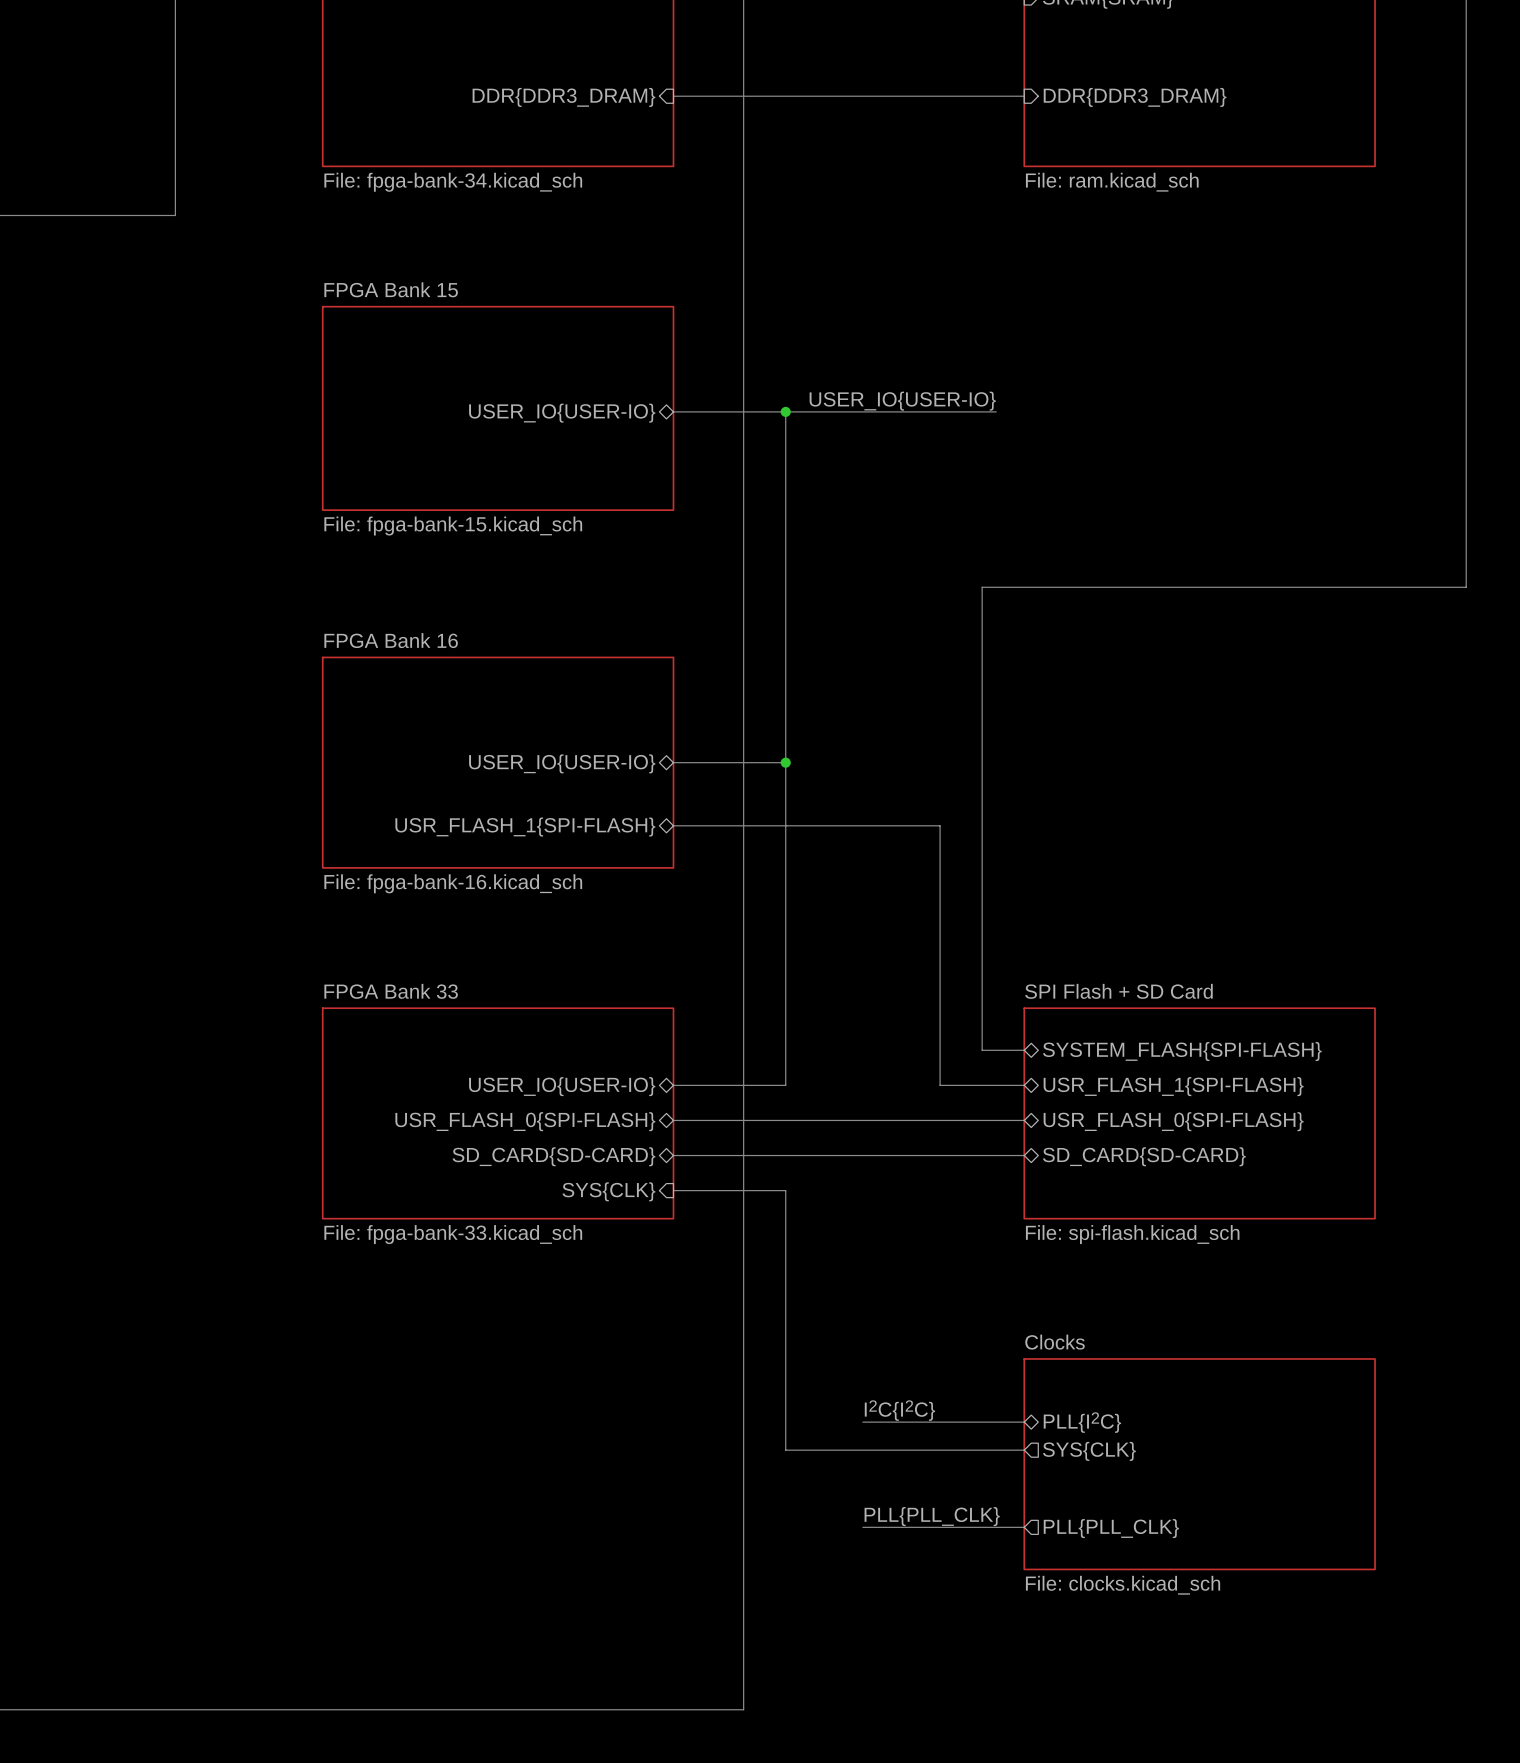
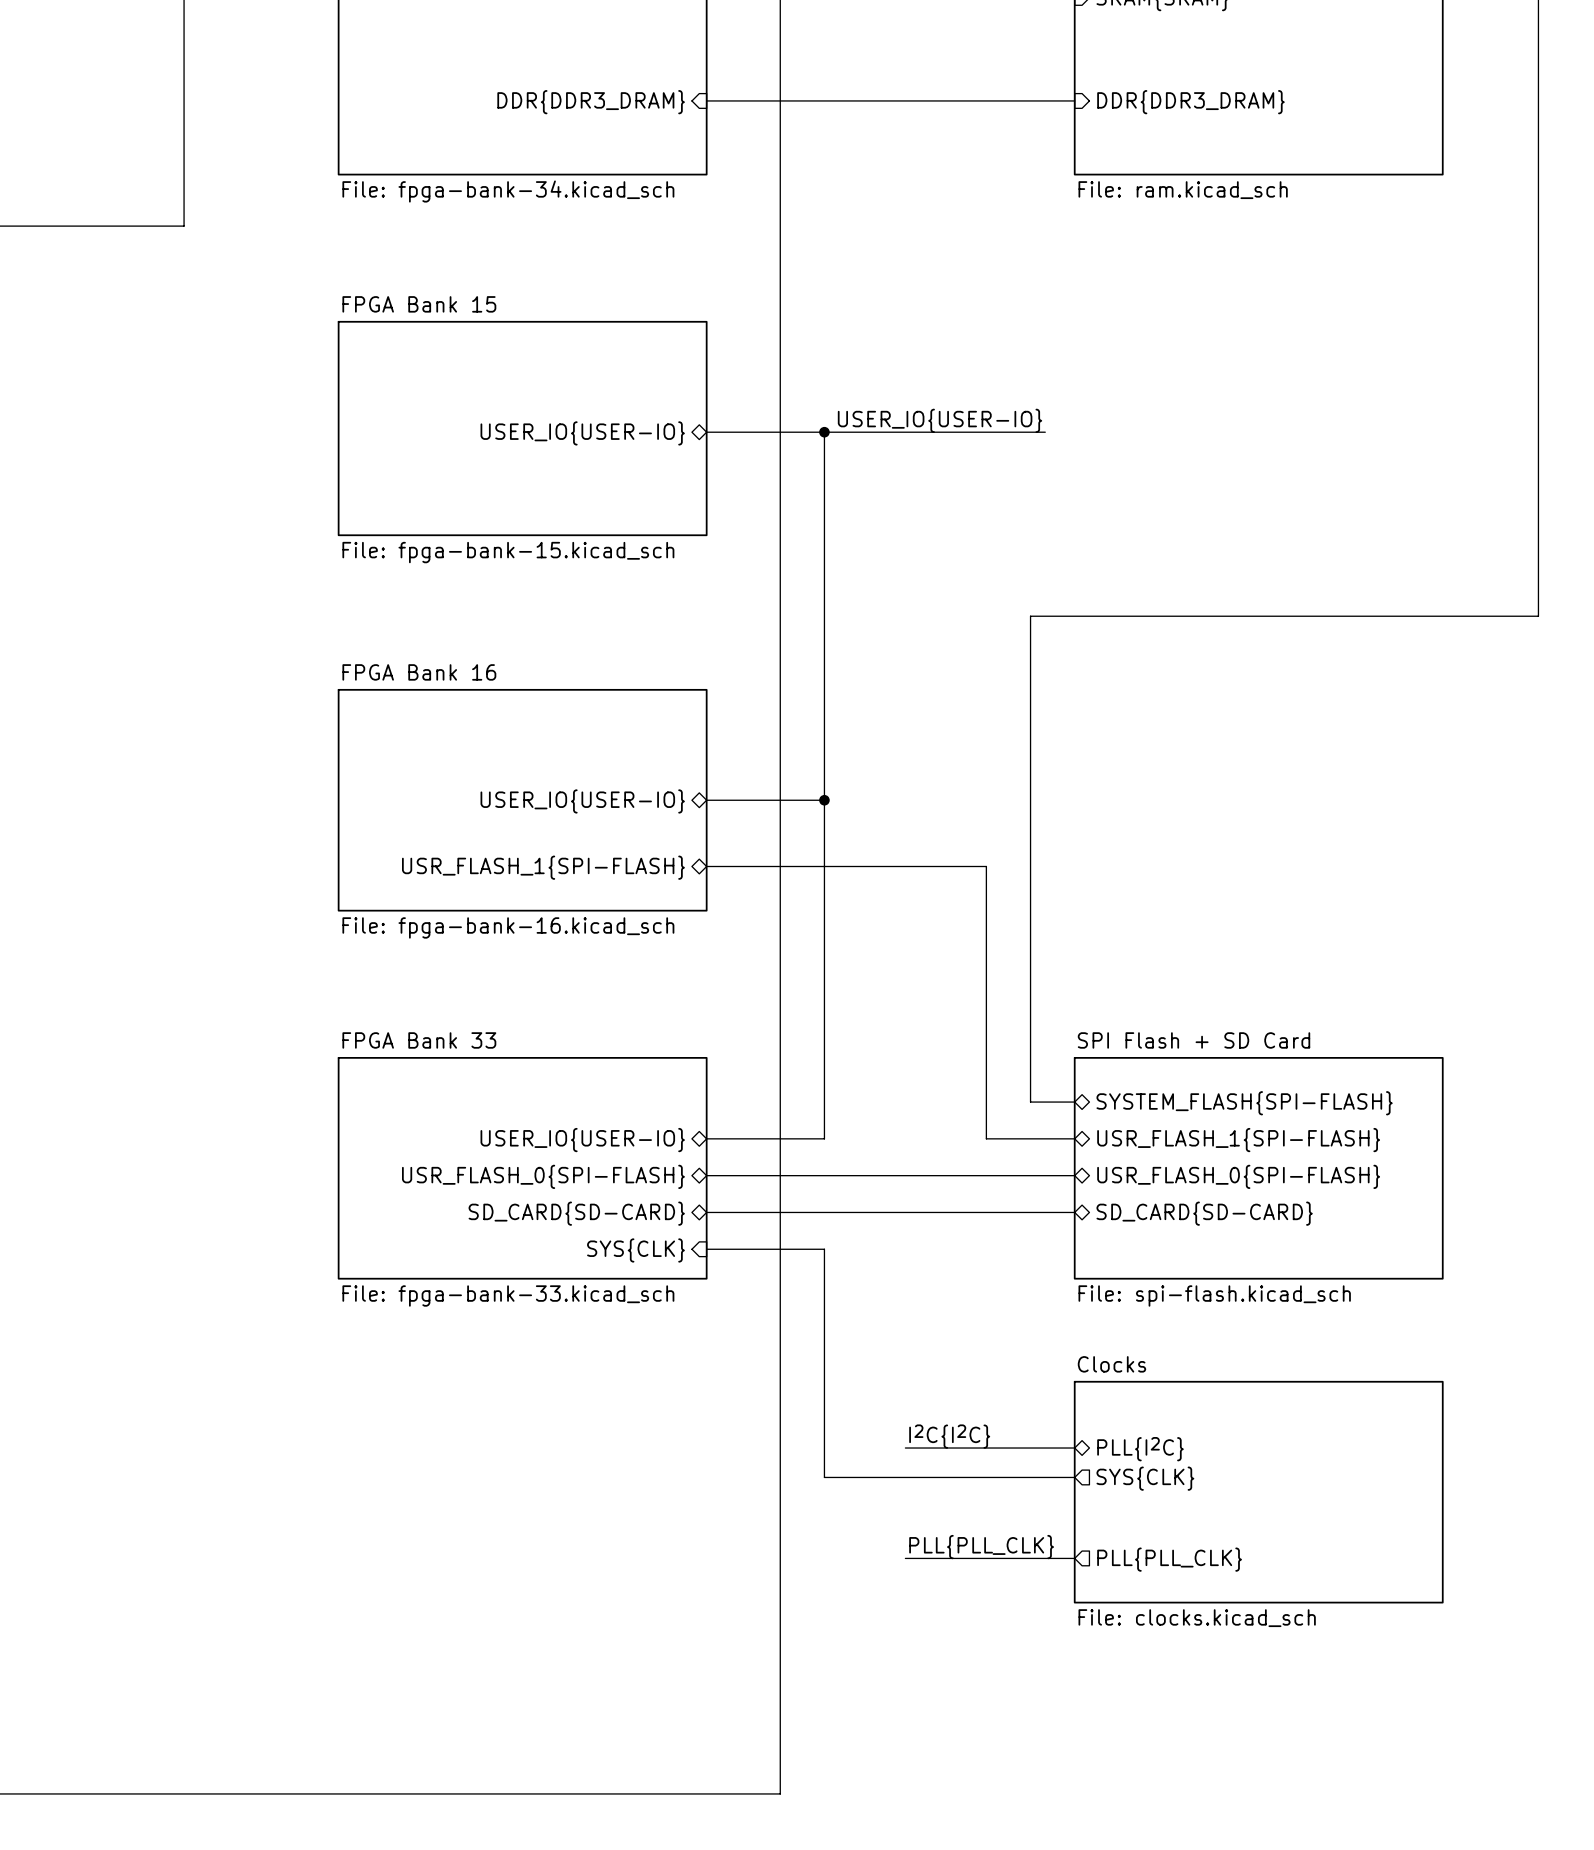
bus: (785, 1408) (785, 1450) (1024, 1450) -> (824, 1477) (1074, 1477)
label position: I2C{I2C} (899, 1410) -> I2C{I2C} (949, 1436)
bus: (862, 1422) (1024, 1422) -> (905, 1448) (1074, 1448)
sheet pin position: PLL{I2C} (1082, 1422) -> PLL{I2C} (1140, 1449)
sheet pin position: SYS{CLK} (1089, 1451) -> SYS{CLK} (1145, 1478)
sheet Clocks position: (1199, 1464) -> (1258, 1492)
label position: PLL{PLL_CLK} (932, 1516) -> PLL{PLL_CLK} (981, 1547)
bus: (862, 1527) (1024, 1527) -> (905, 1558) (1074, 1558)
sheet pin position: PLL{PLL_CLK} (1111, 1528) -> PLL{PLL_CLK} (1169, 1559)

